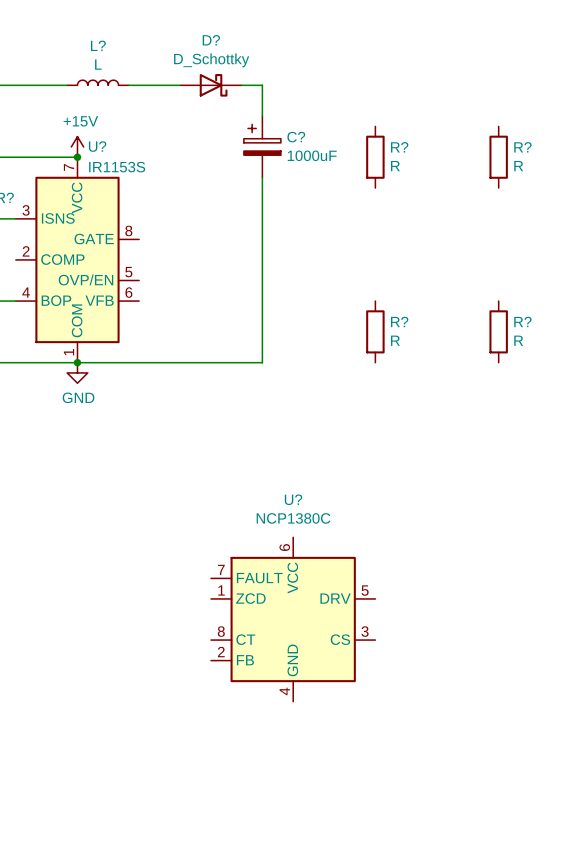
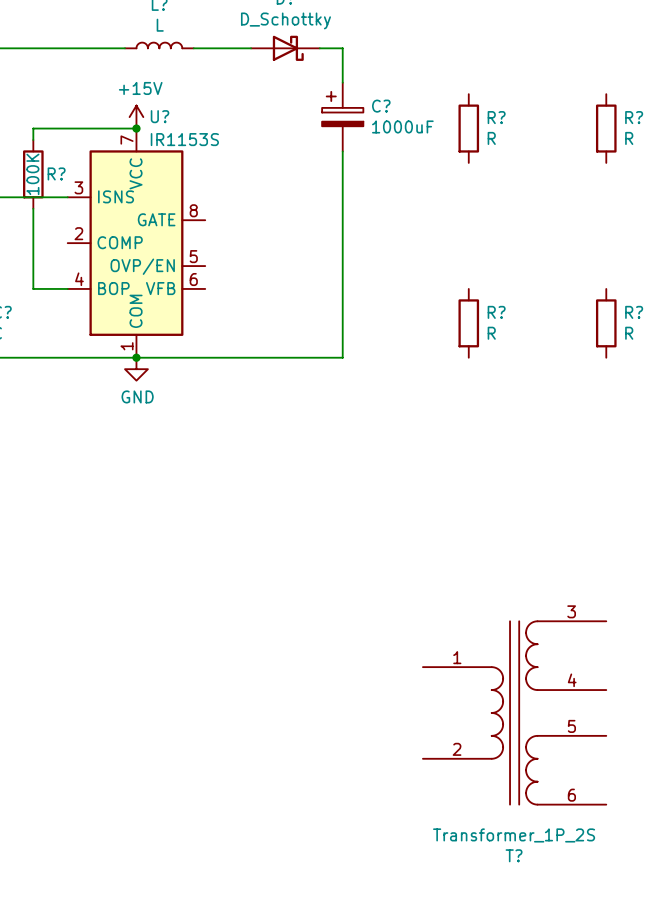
U?: NCP1380C (293, 619) -> none
T?: none -> Transformer_1P_2S (514, 712)

